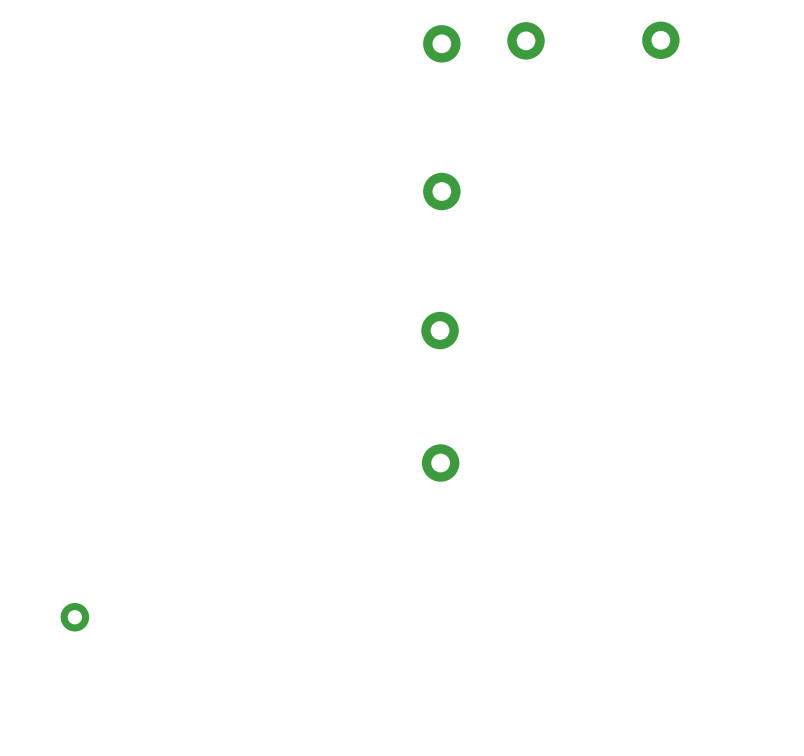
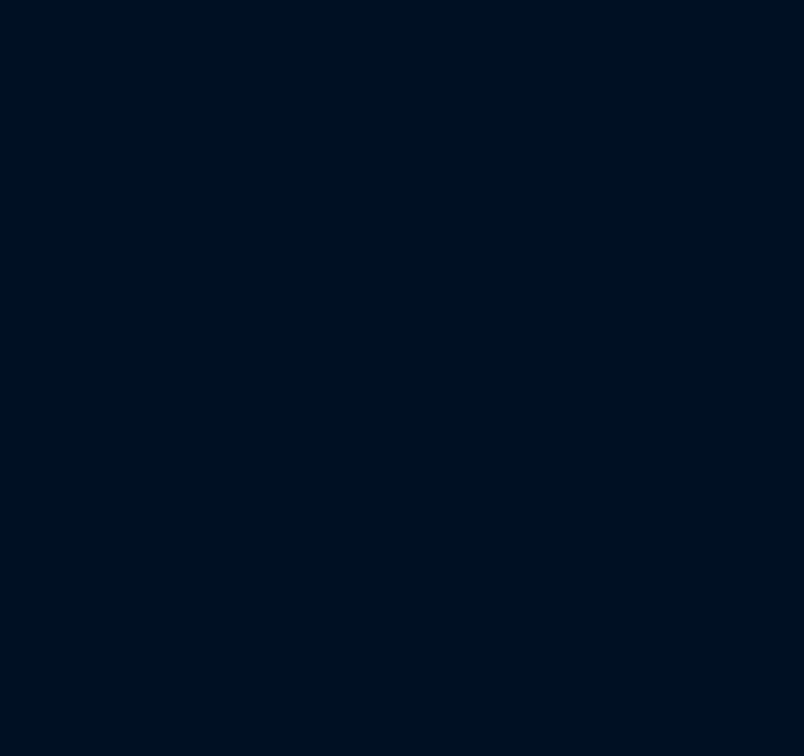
via: (526, 40) -> none
via: (660, 40) -> none
via: (441, 43) -> none
via: (441, 191) -> none
via: (440, 330) -> none
via: (440, 462) -> none
via: (74, 617) -> none

